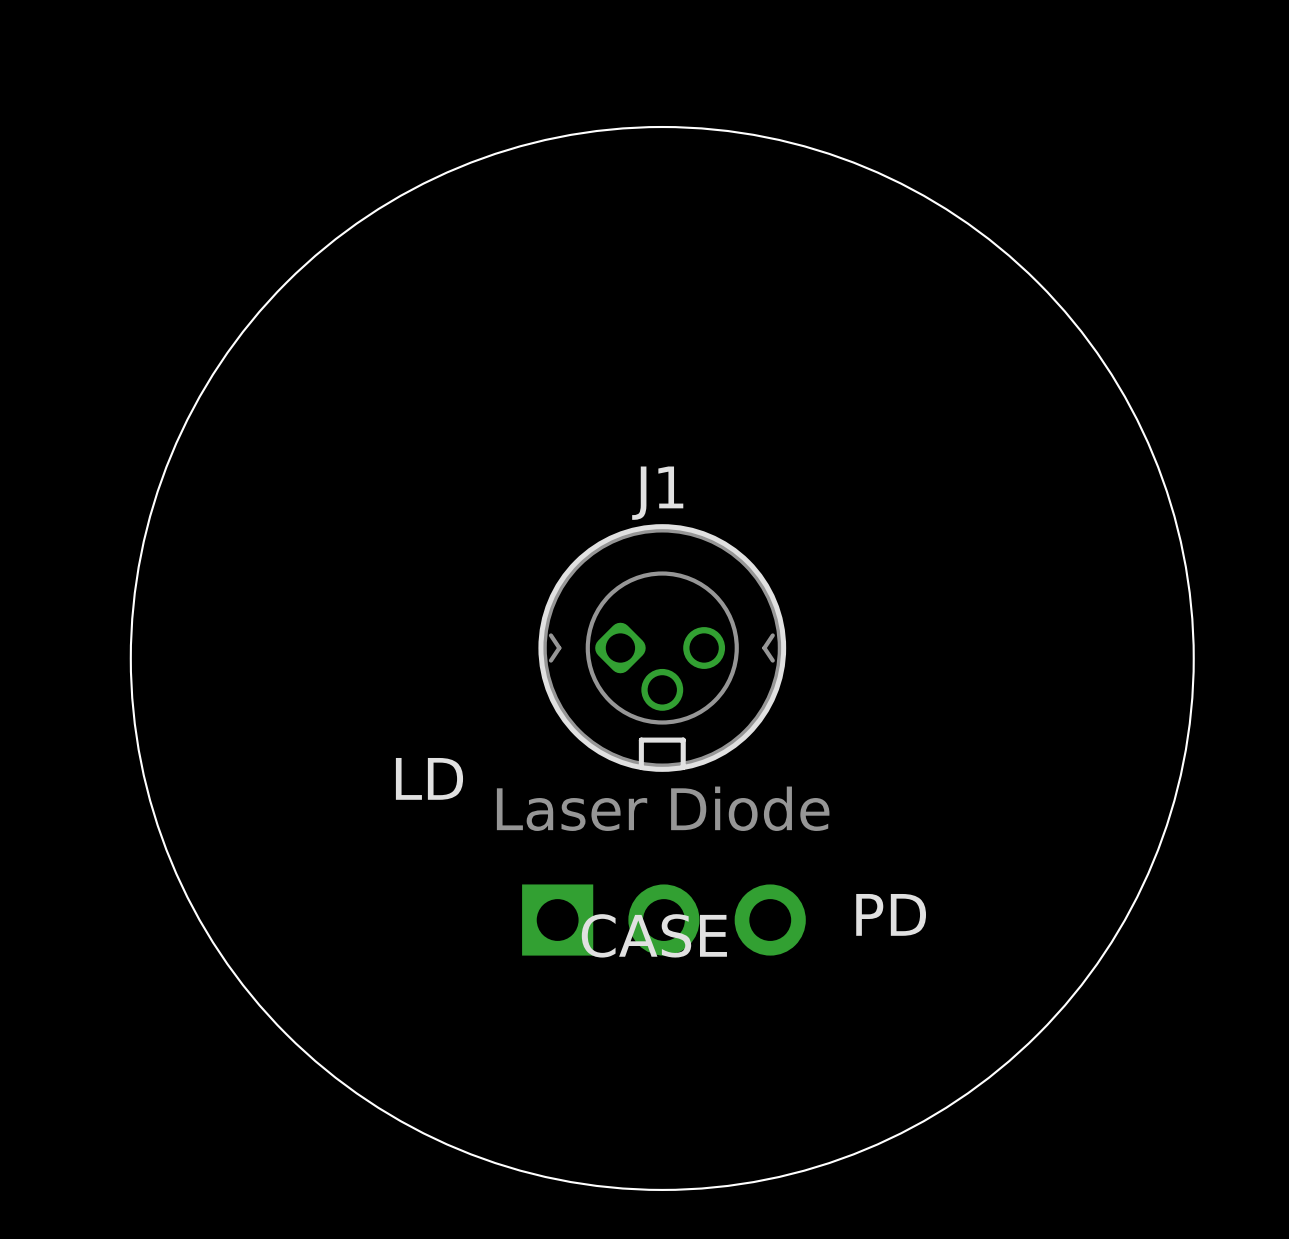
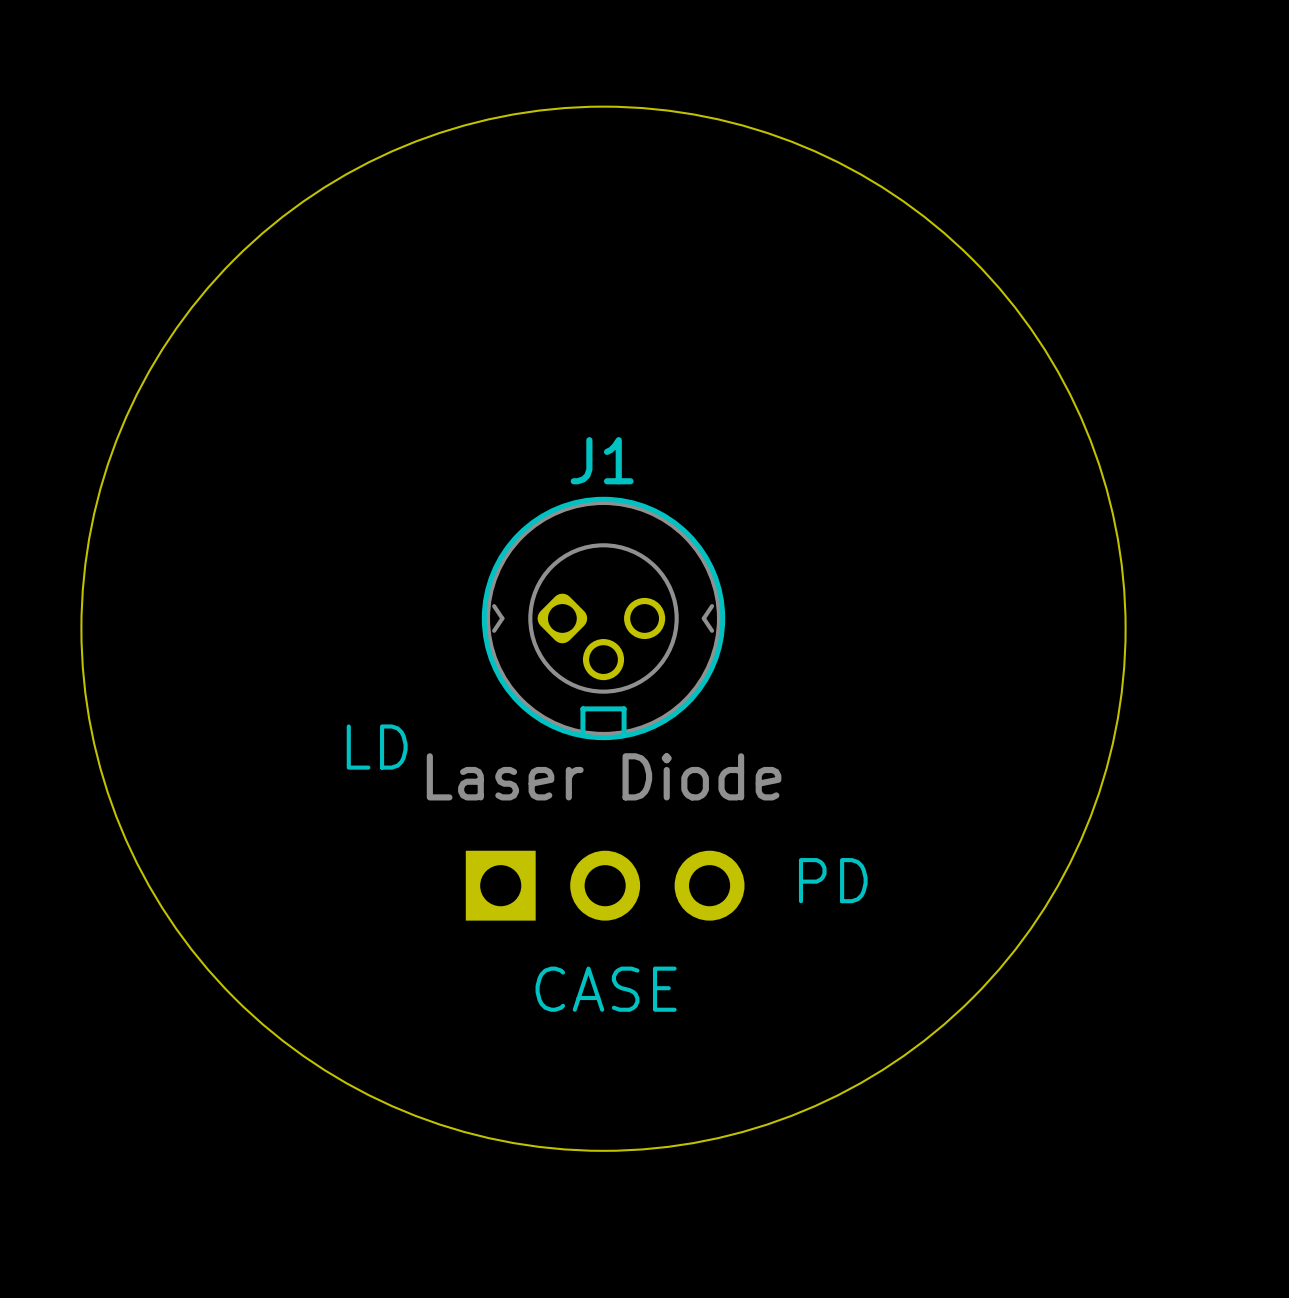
text position: CASE (654, 935) -> CASE (606, 989)

